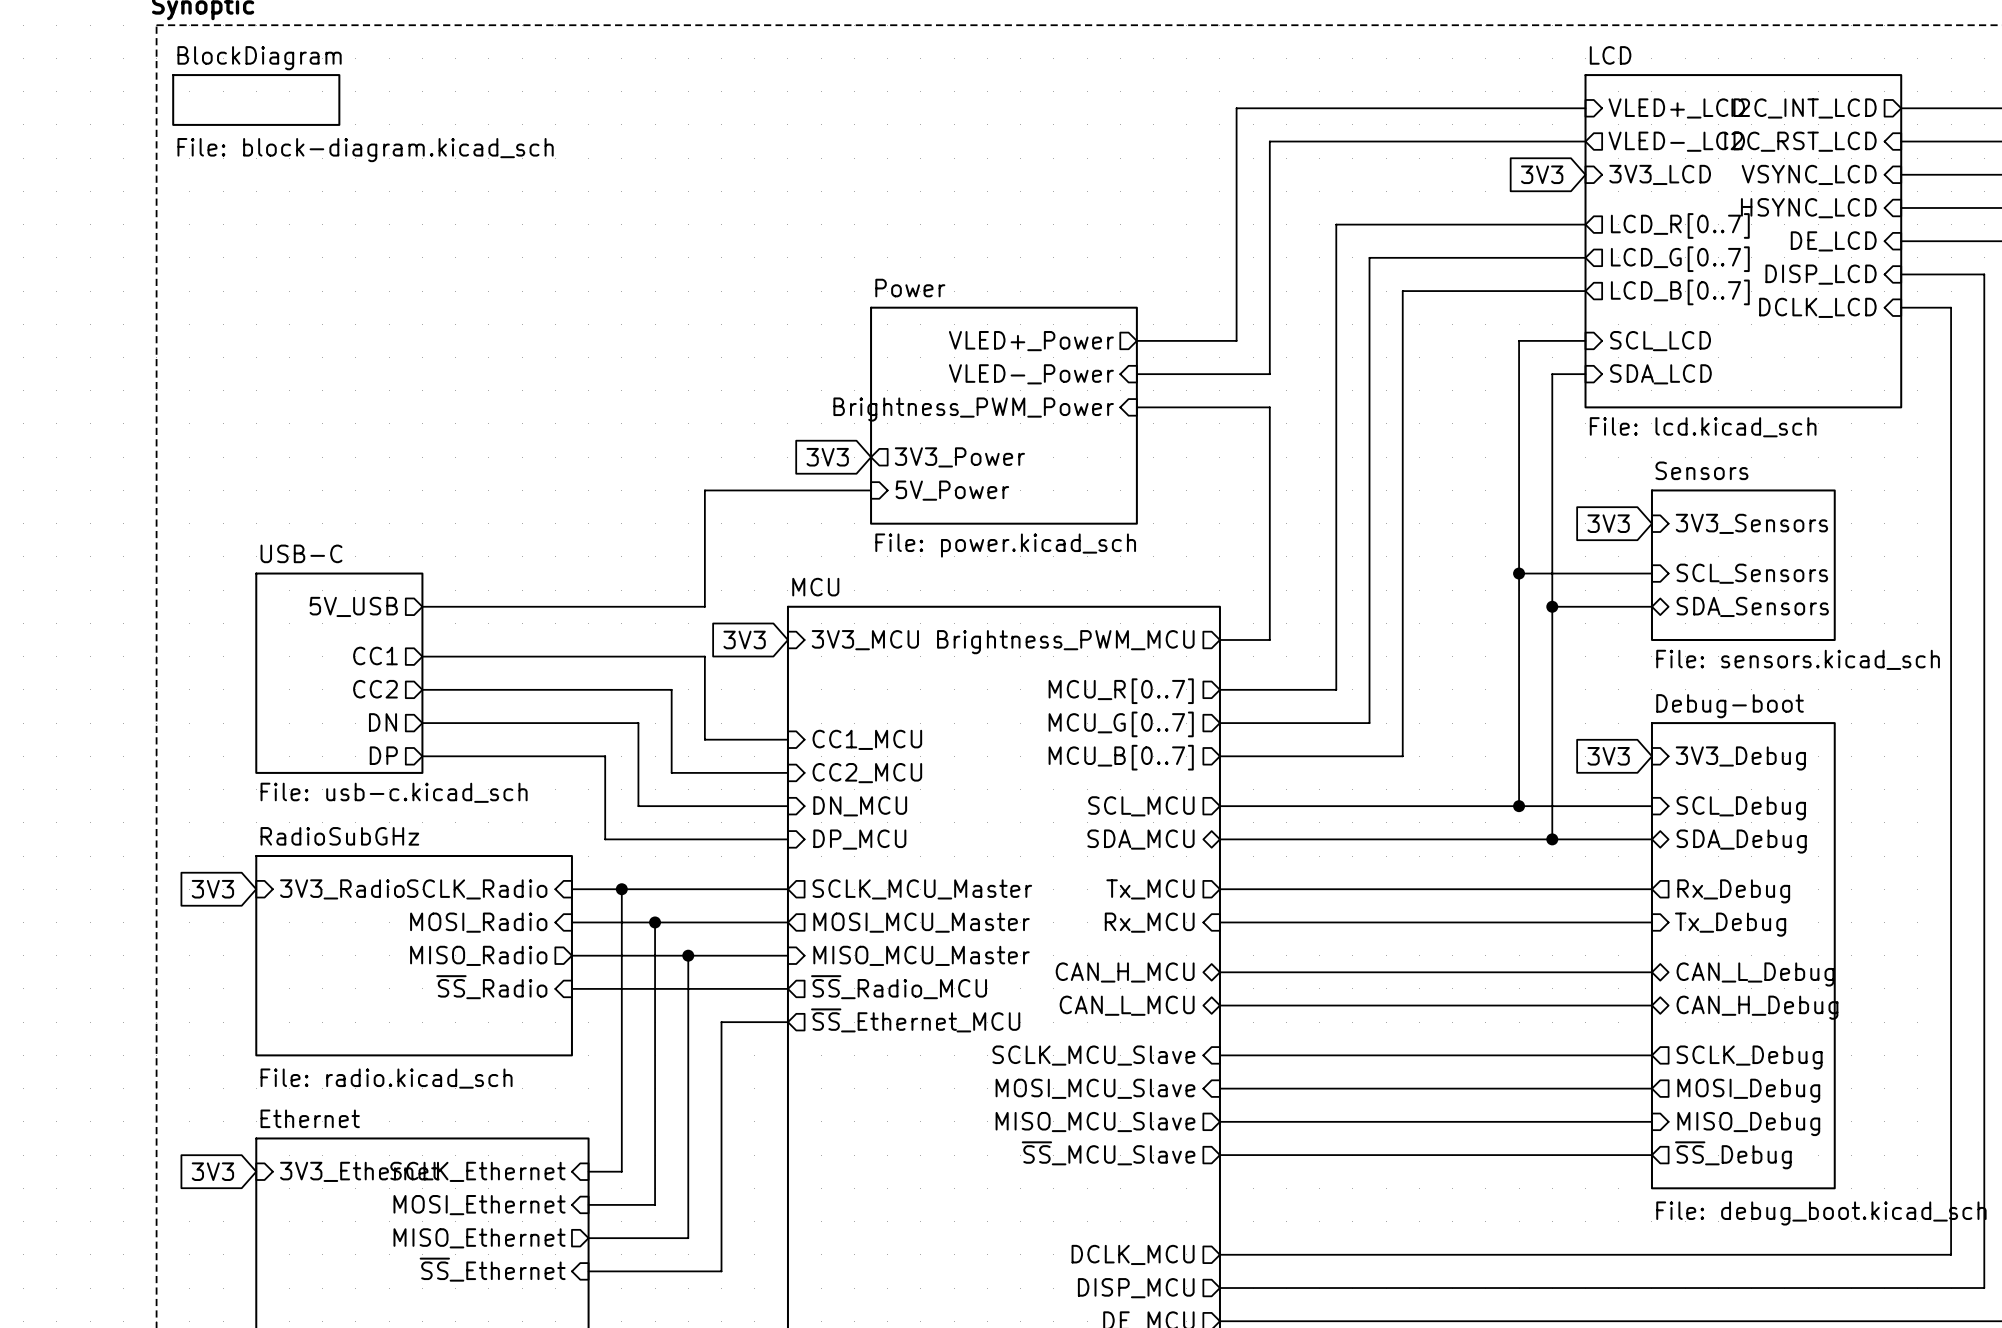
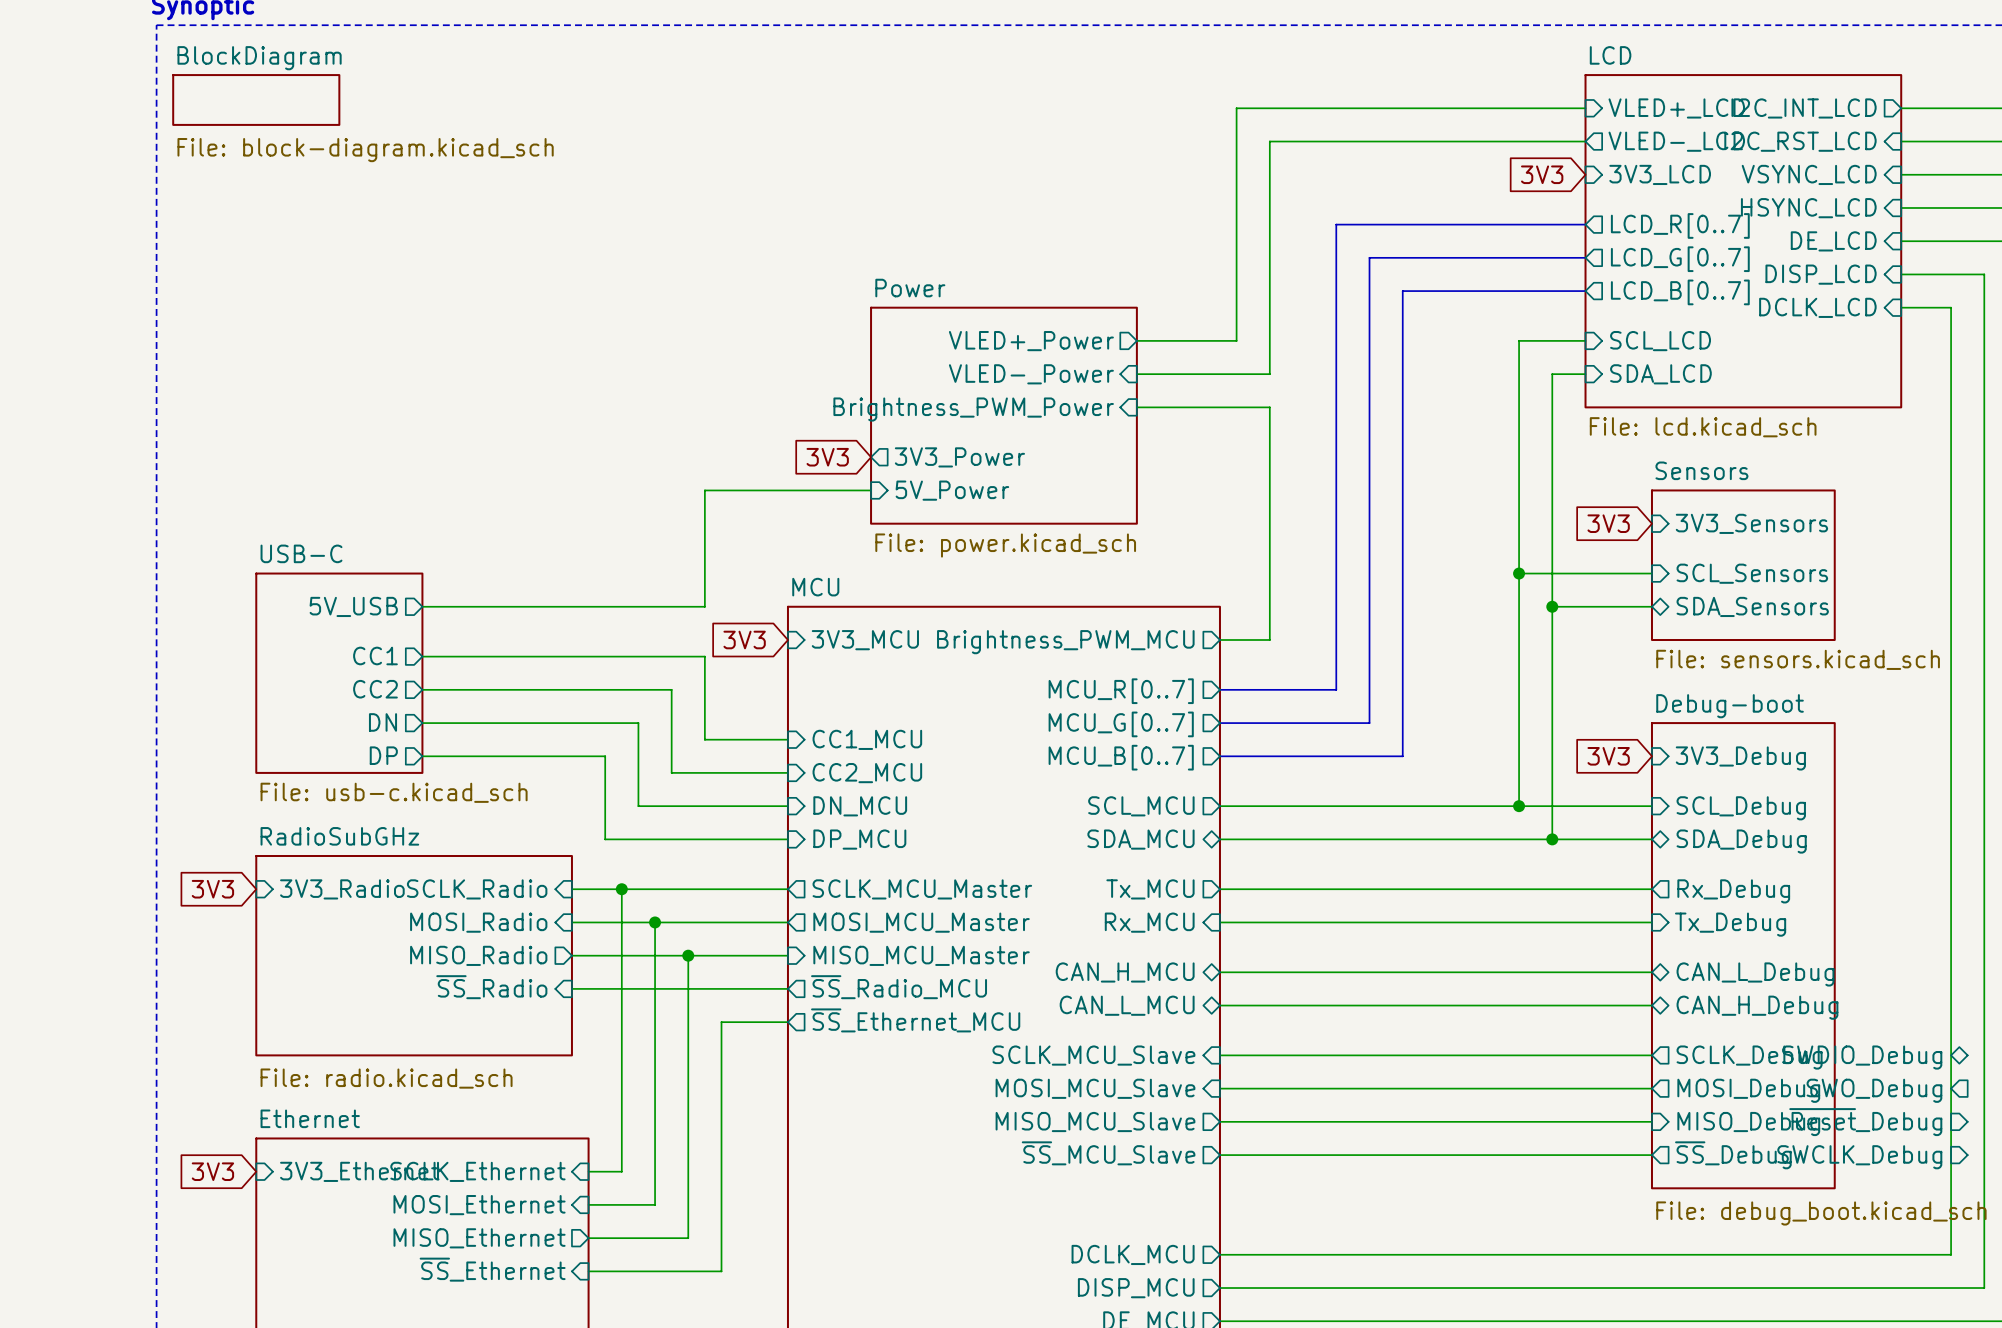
sheet pin: none -> SWDIO_Debug (1862, 1057)
sheet pin: none -> SWO_Debug (1874, 1090)
sheet pin: none -> ~{Reset}_Debug (1865, 1122)
sheet pin: none -> SWCLK_Debug (1859, 1157)

